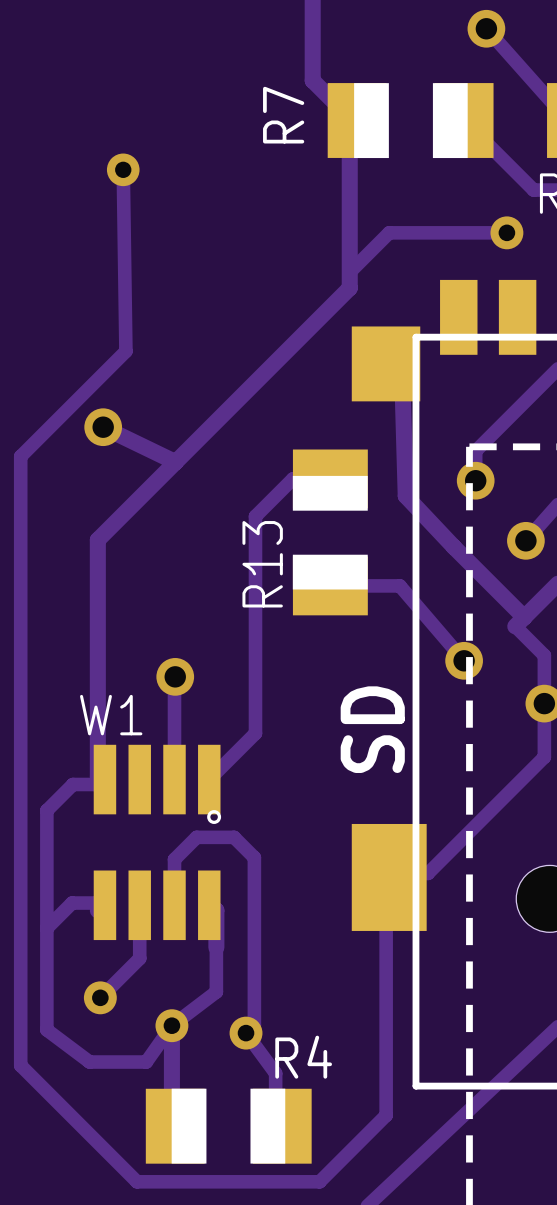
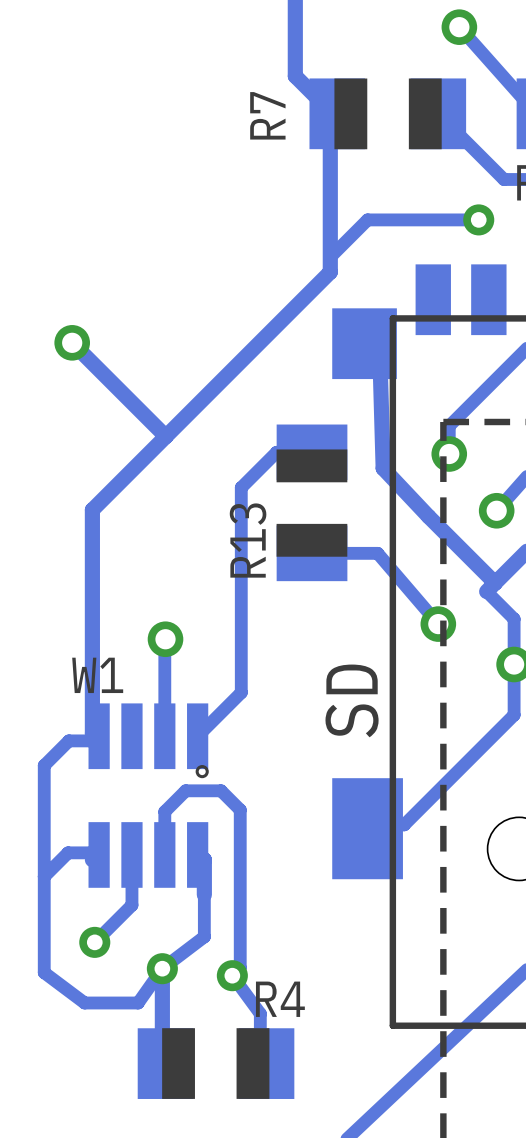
track: (123, 169) (125, 351) (20, 456) (20, 1065) (136, 1181) (319, 1181) (386, 1115) (386, 882) (389, 877) -> none
via: (123, 169) -> none
track: (103, 427) (175, 462) -> (72, 342) (165, 436)
via position: (103, 427) -> (72, 342)

